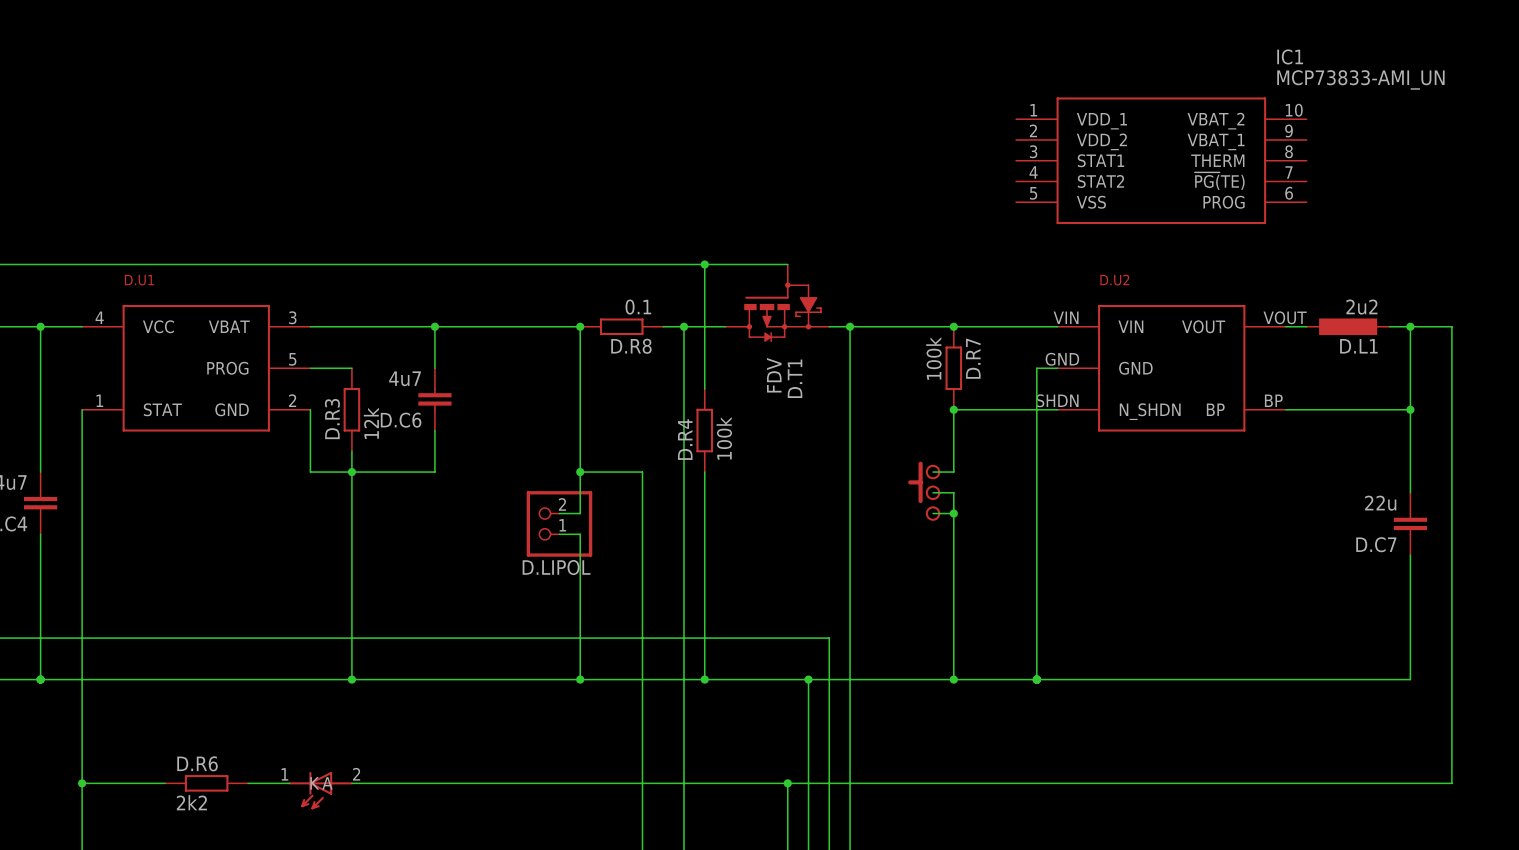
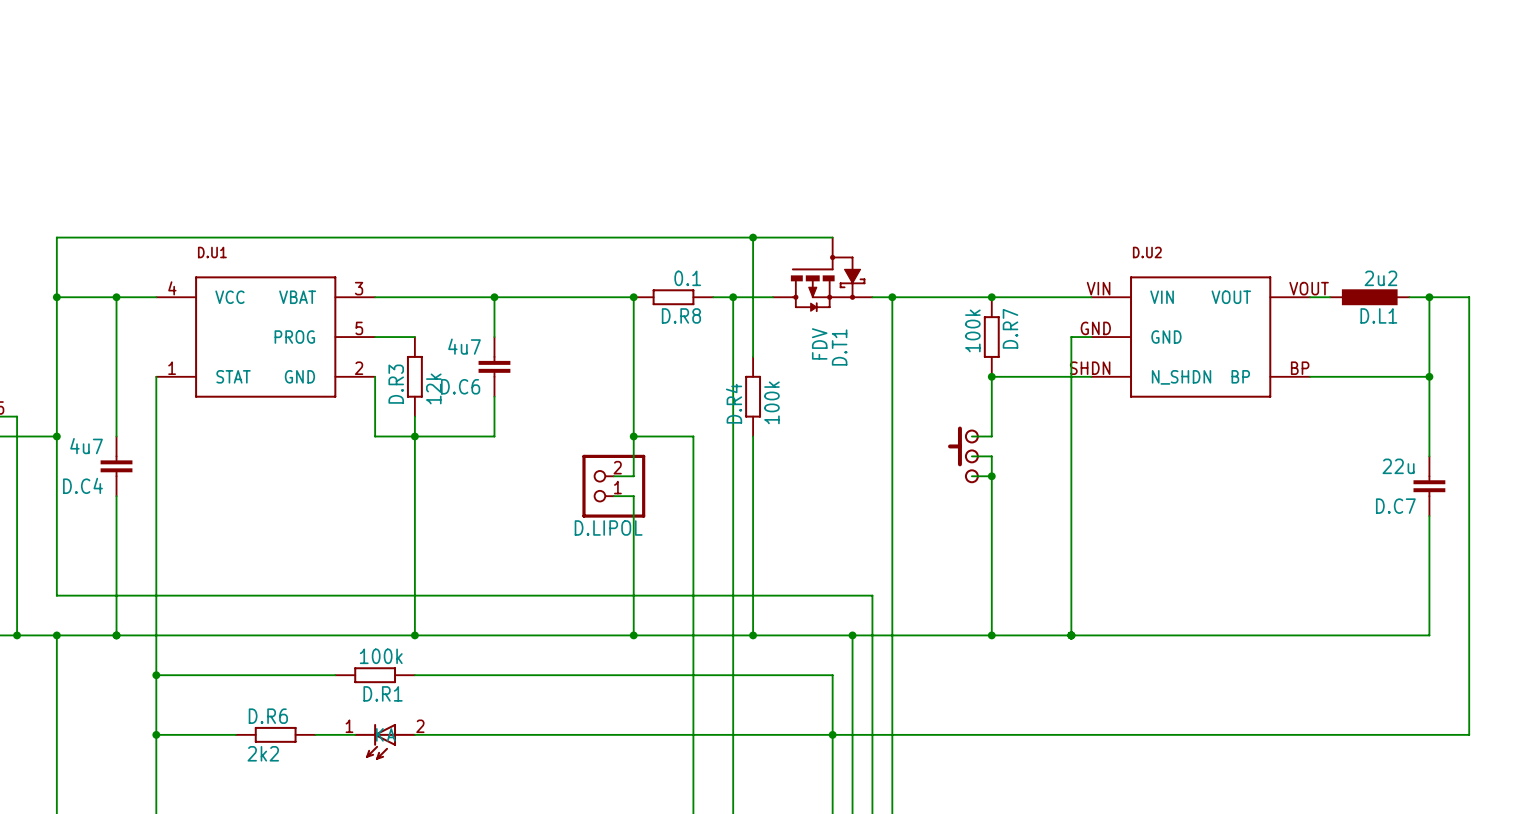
IC1: MCP73833-AMI_UN (1161, 160) -> none
wire: none -> (156, 675) (335, 675)
junction: none -> (156, 675)
D.R1: none -> 100k (375, 675)
wire: none -> (414, 675) (832, 675) (832, 734)

